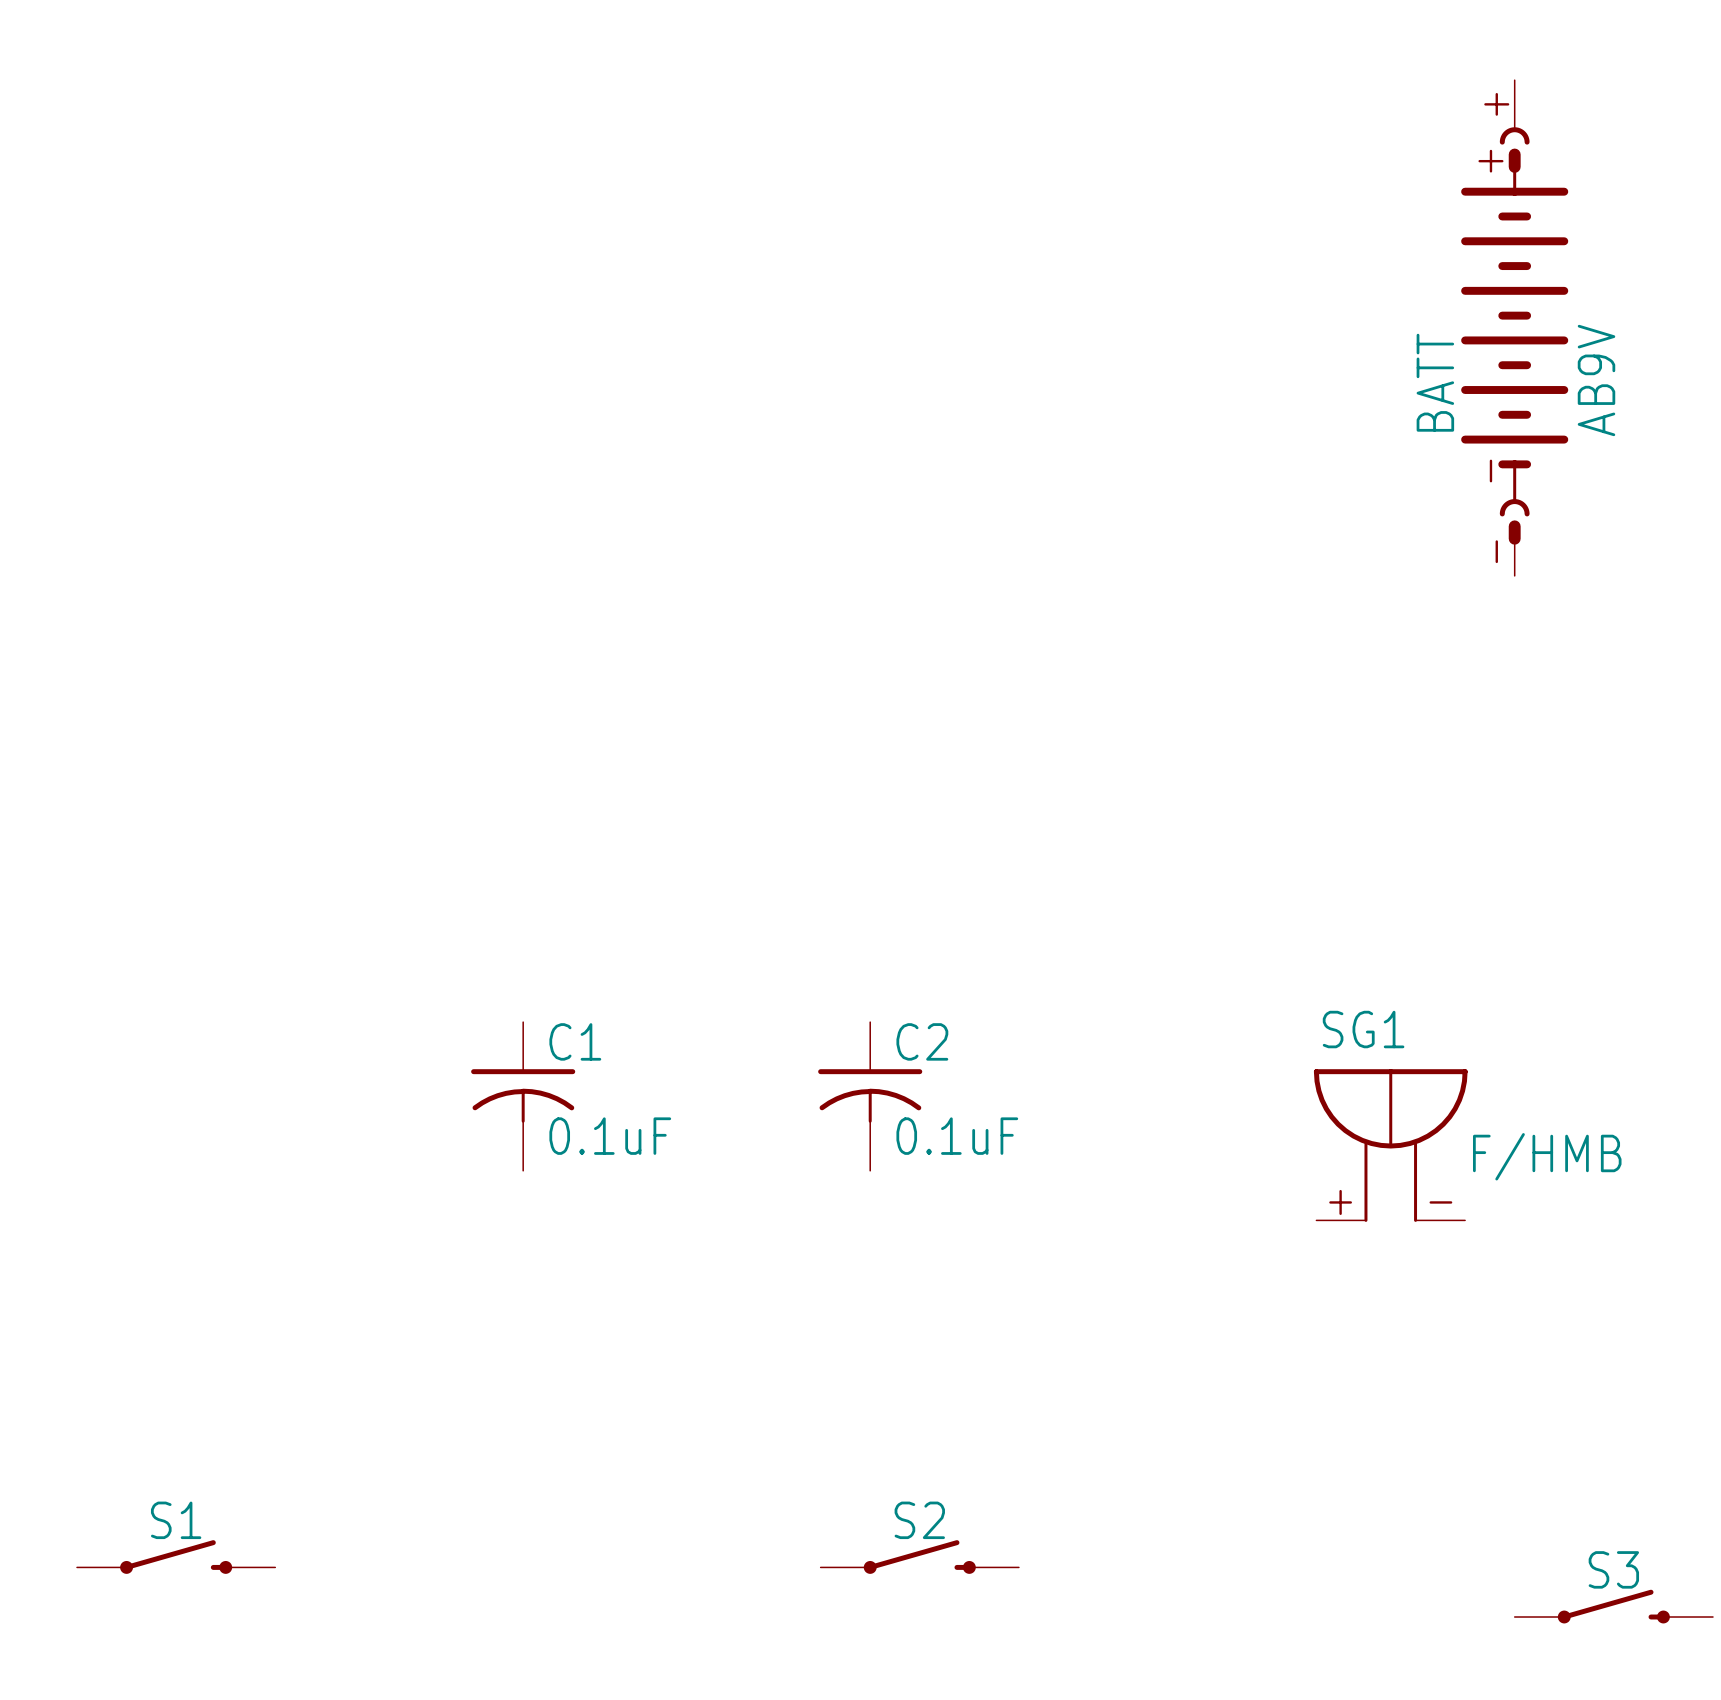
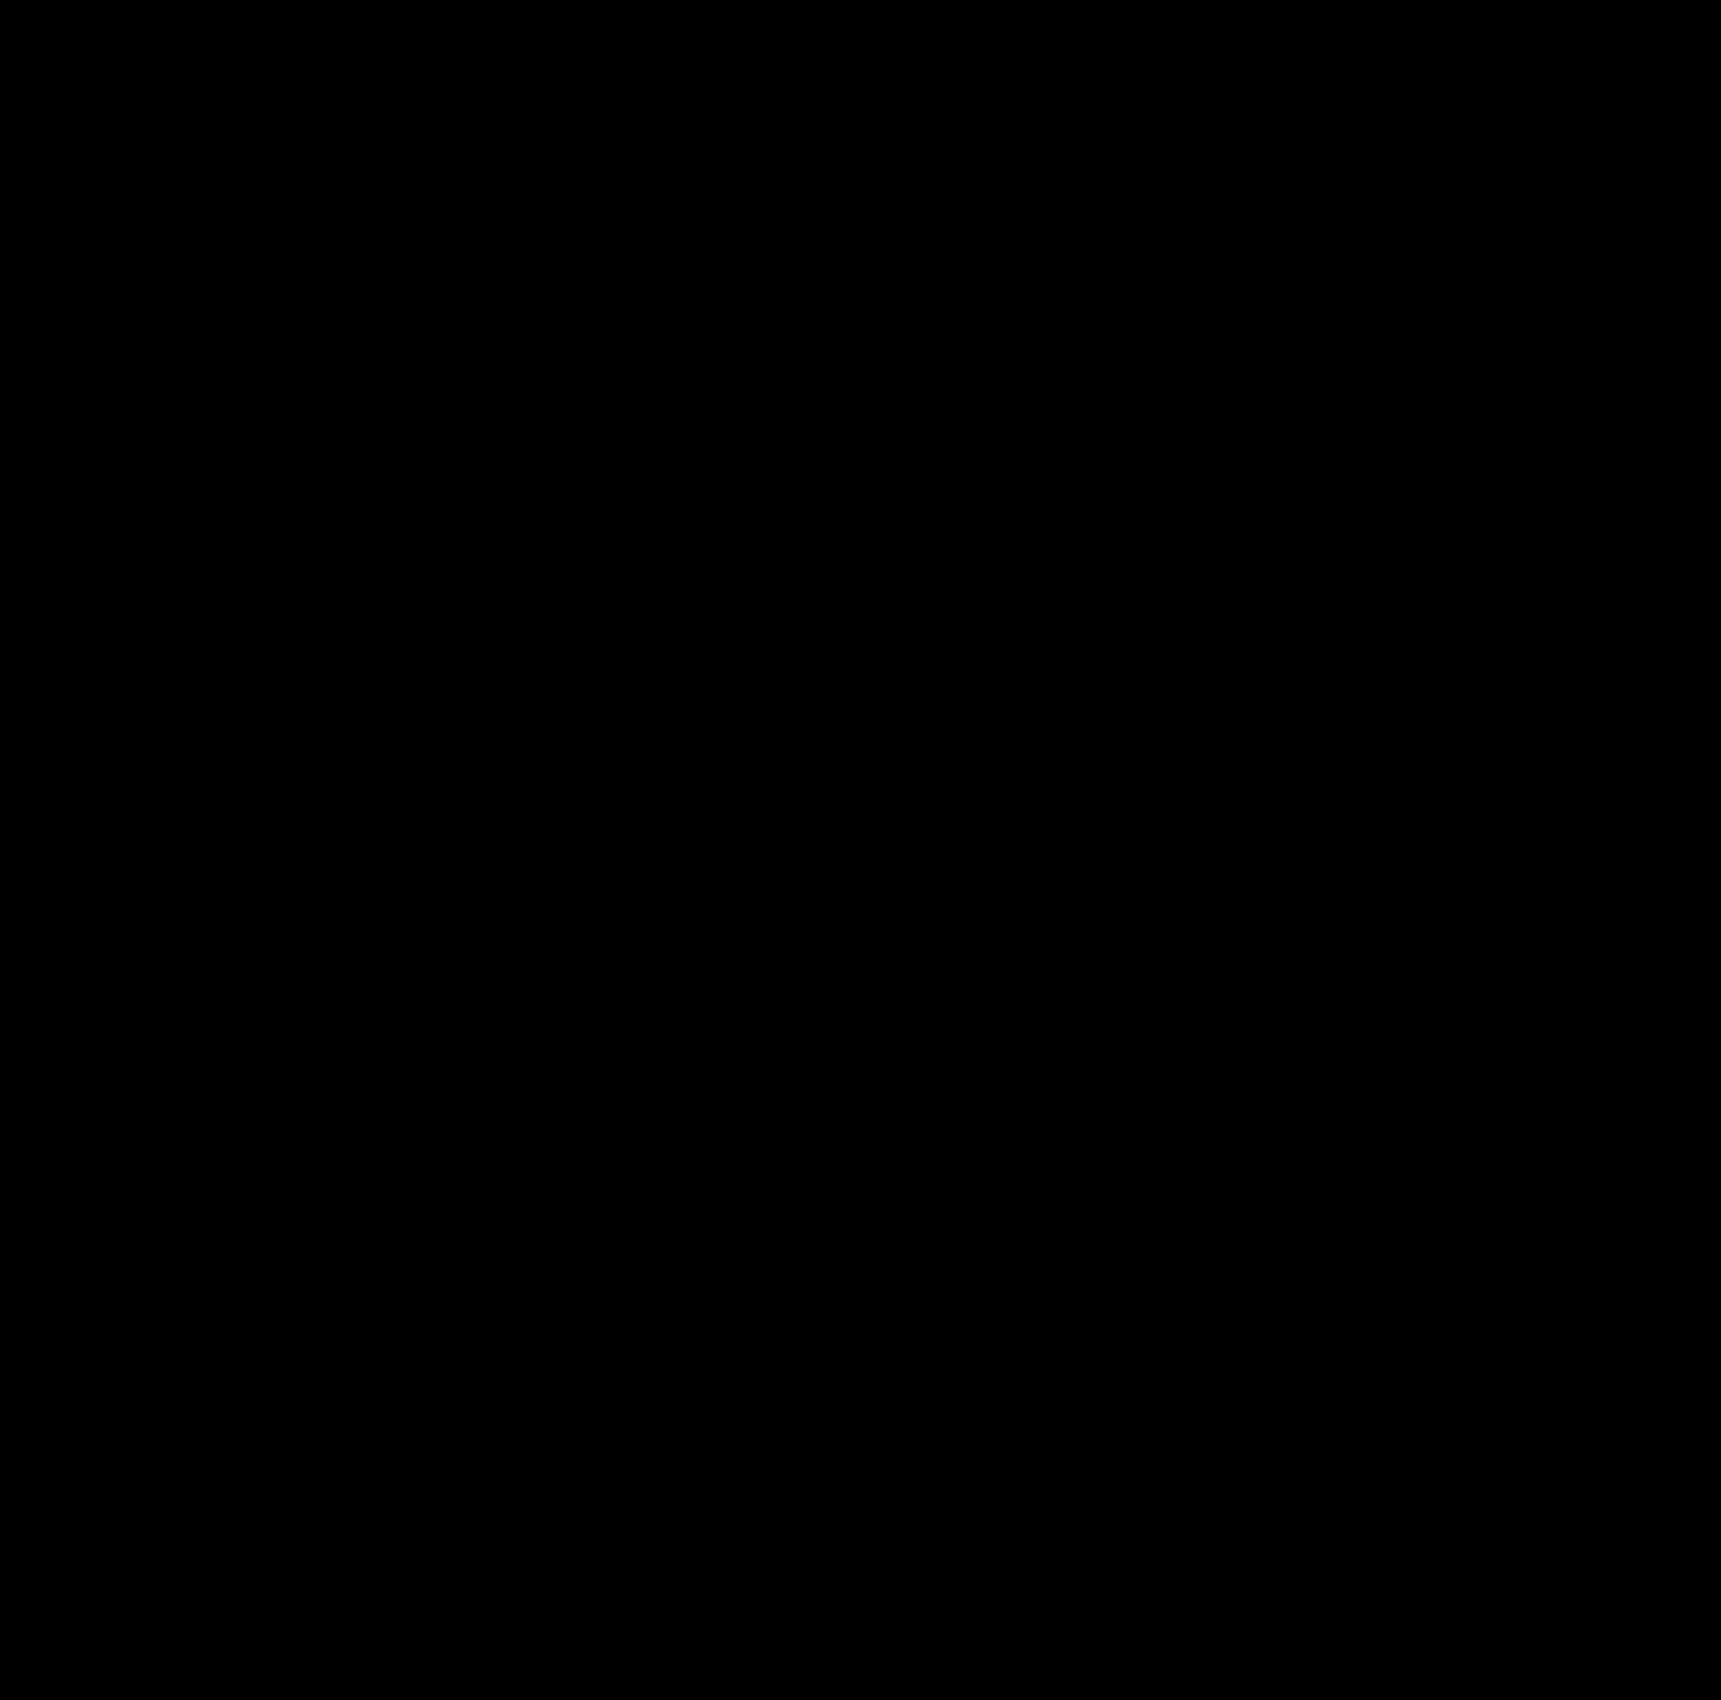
BATT: AB9V (1514, 328) -> none
C1: 0.1uF (523, 1096) -> none
C2: 0.1uF (870, 1096) -> none
SG1: F/HMB (1390, 1145) -> none
S1: (176, 1557) -> none
S2: (919, 1557) -> none
S3: (1613, 1606) -> none

